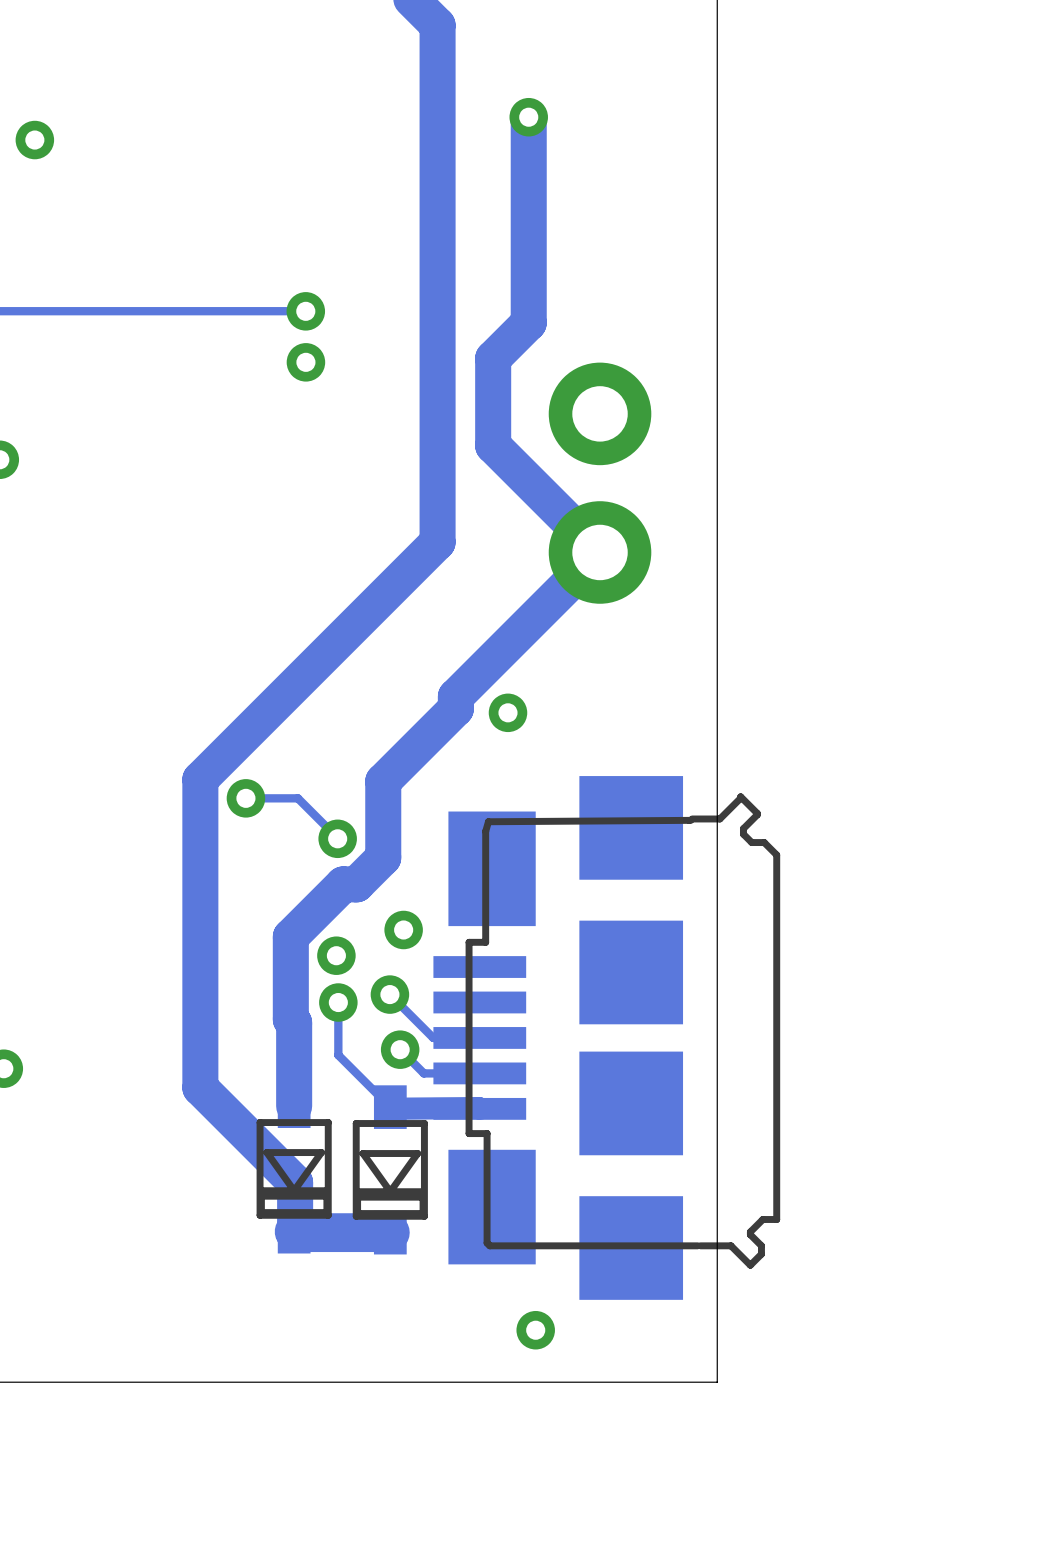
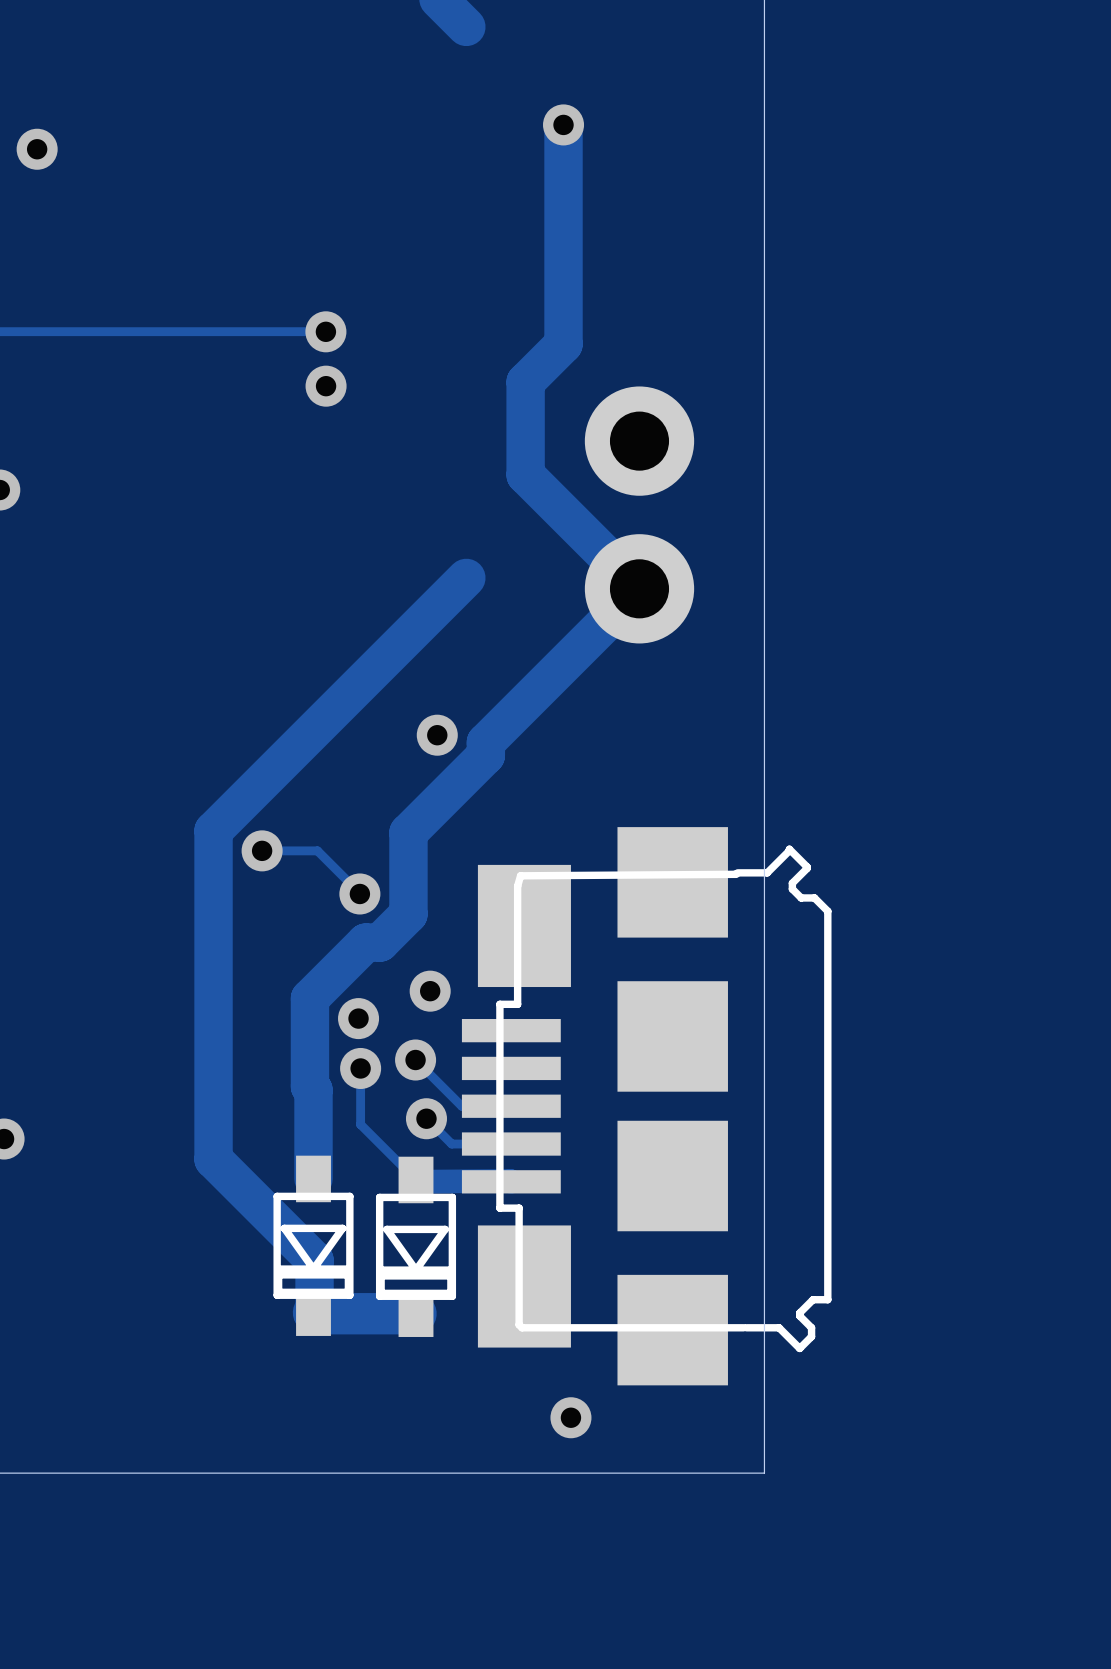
track: (437, 25) (437, 542) -> none
via position: (507, 712) -> (437, 735)

